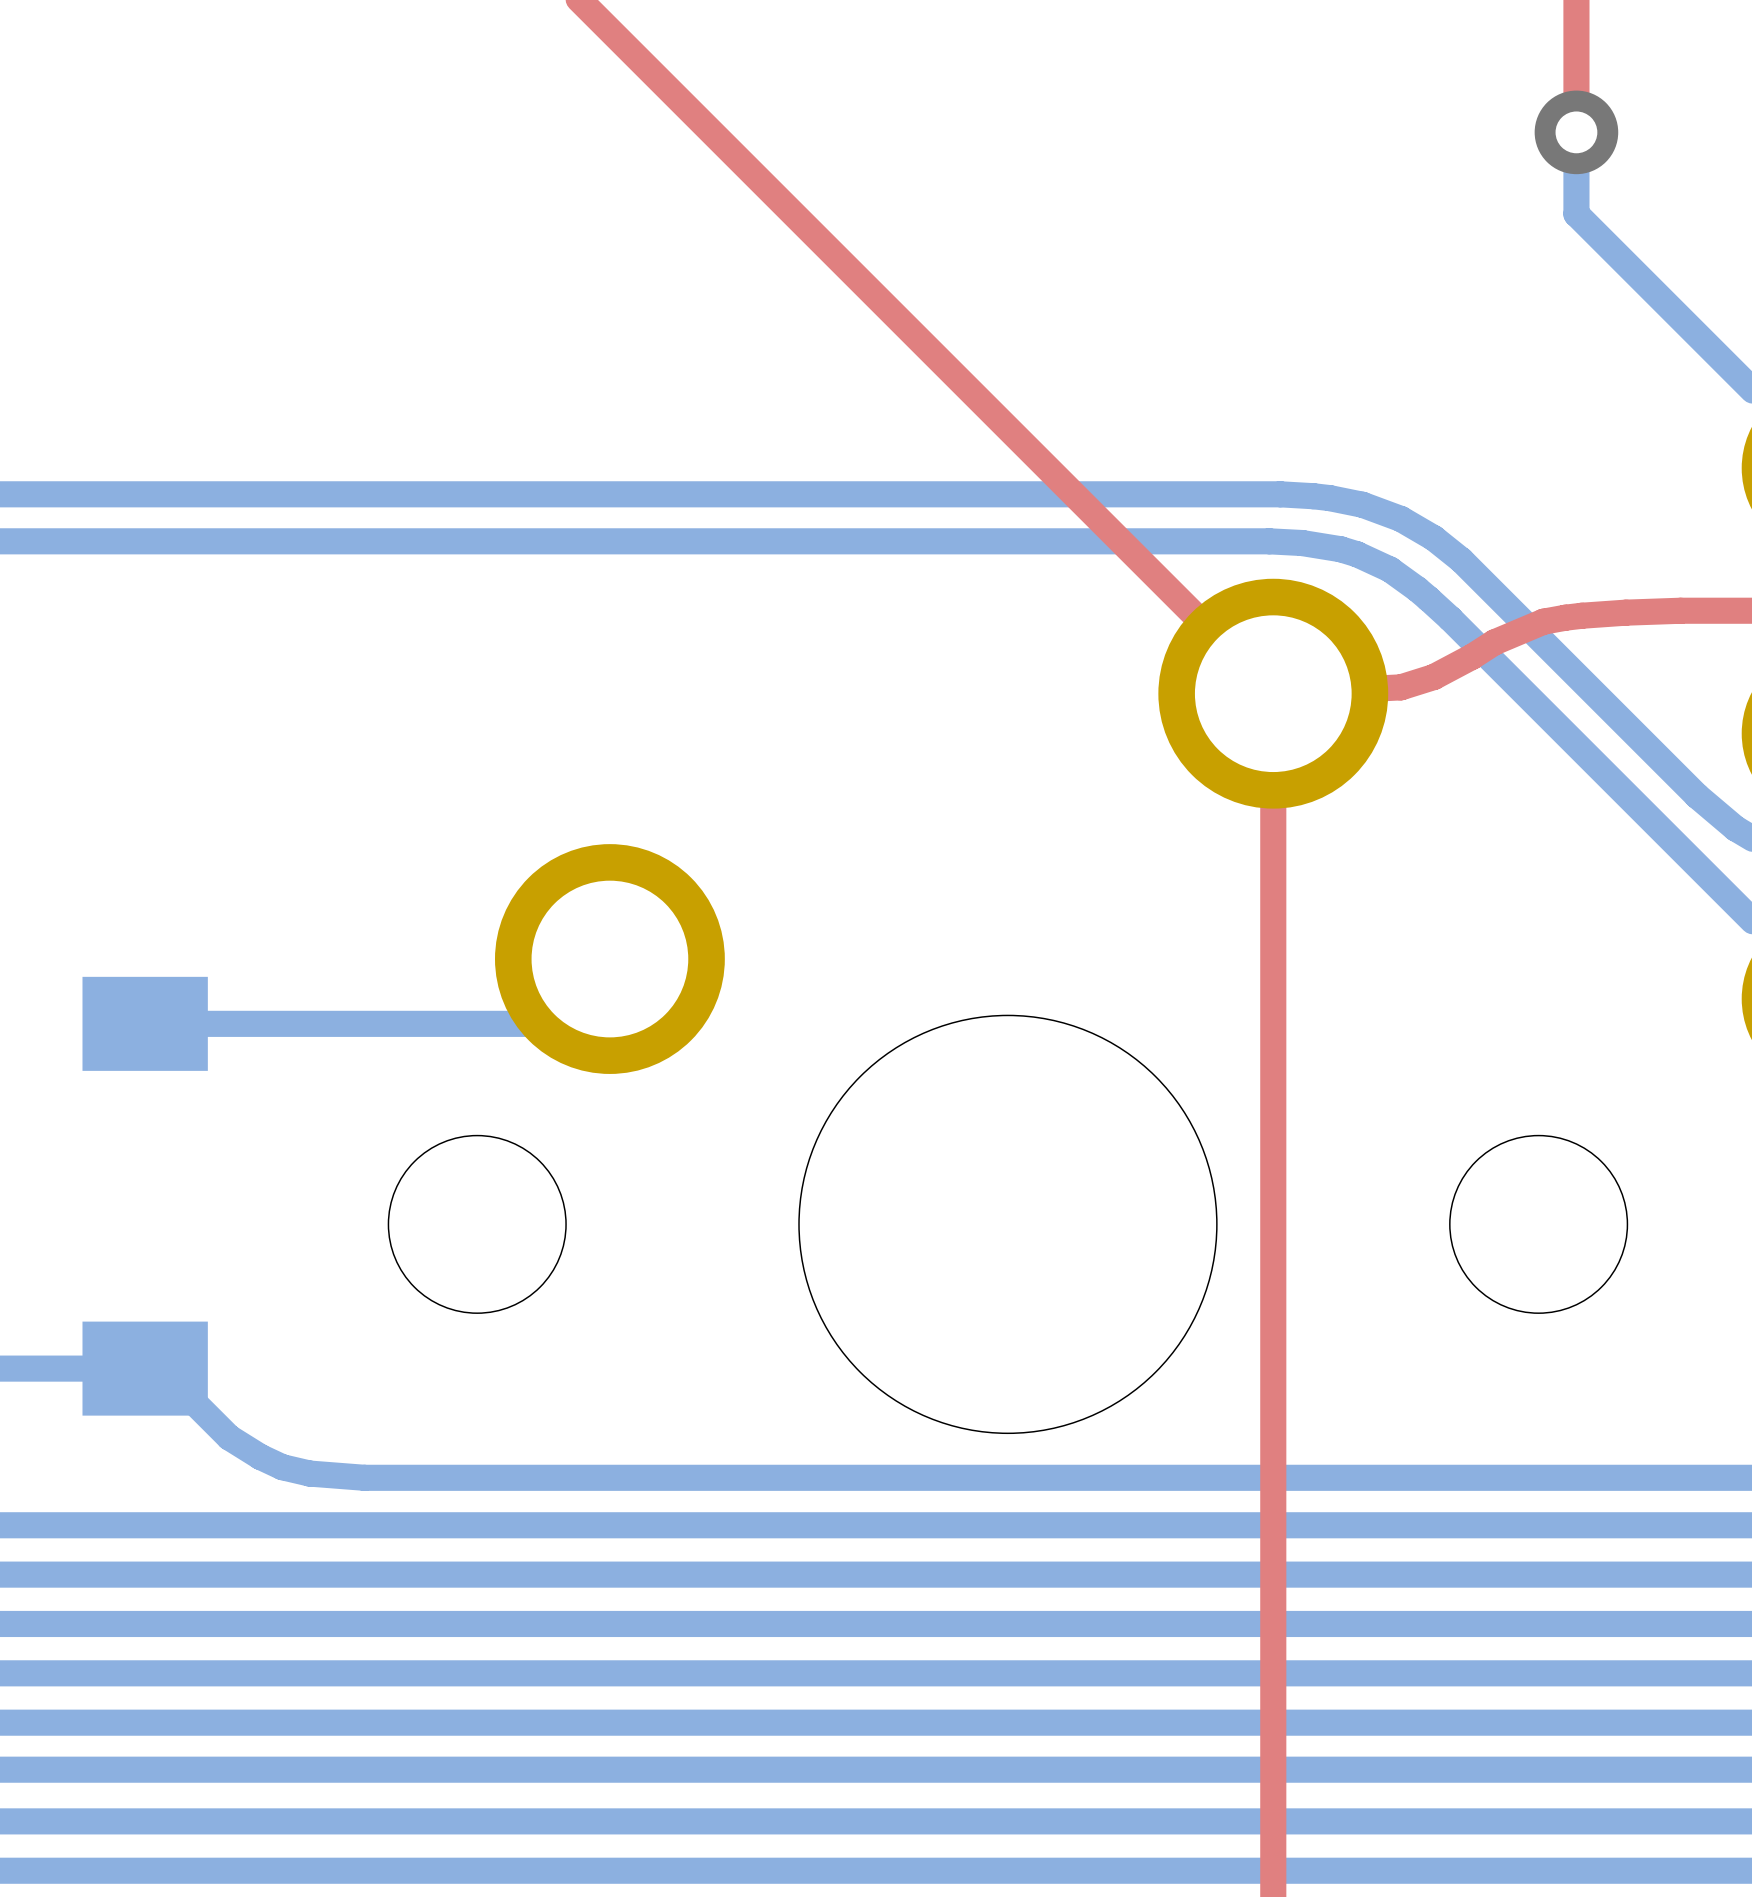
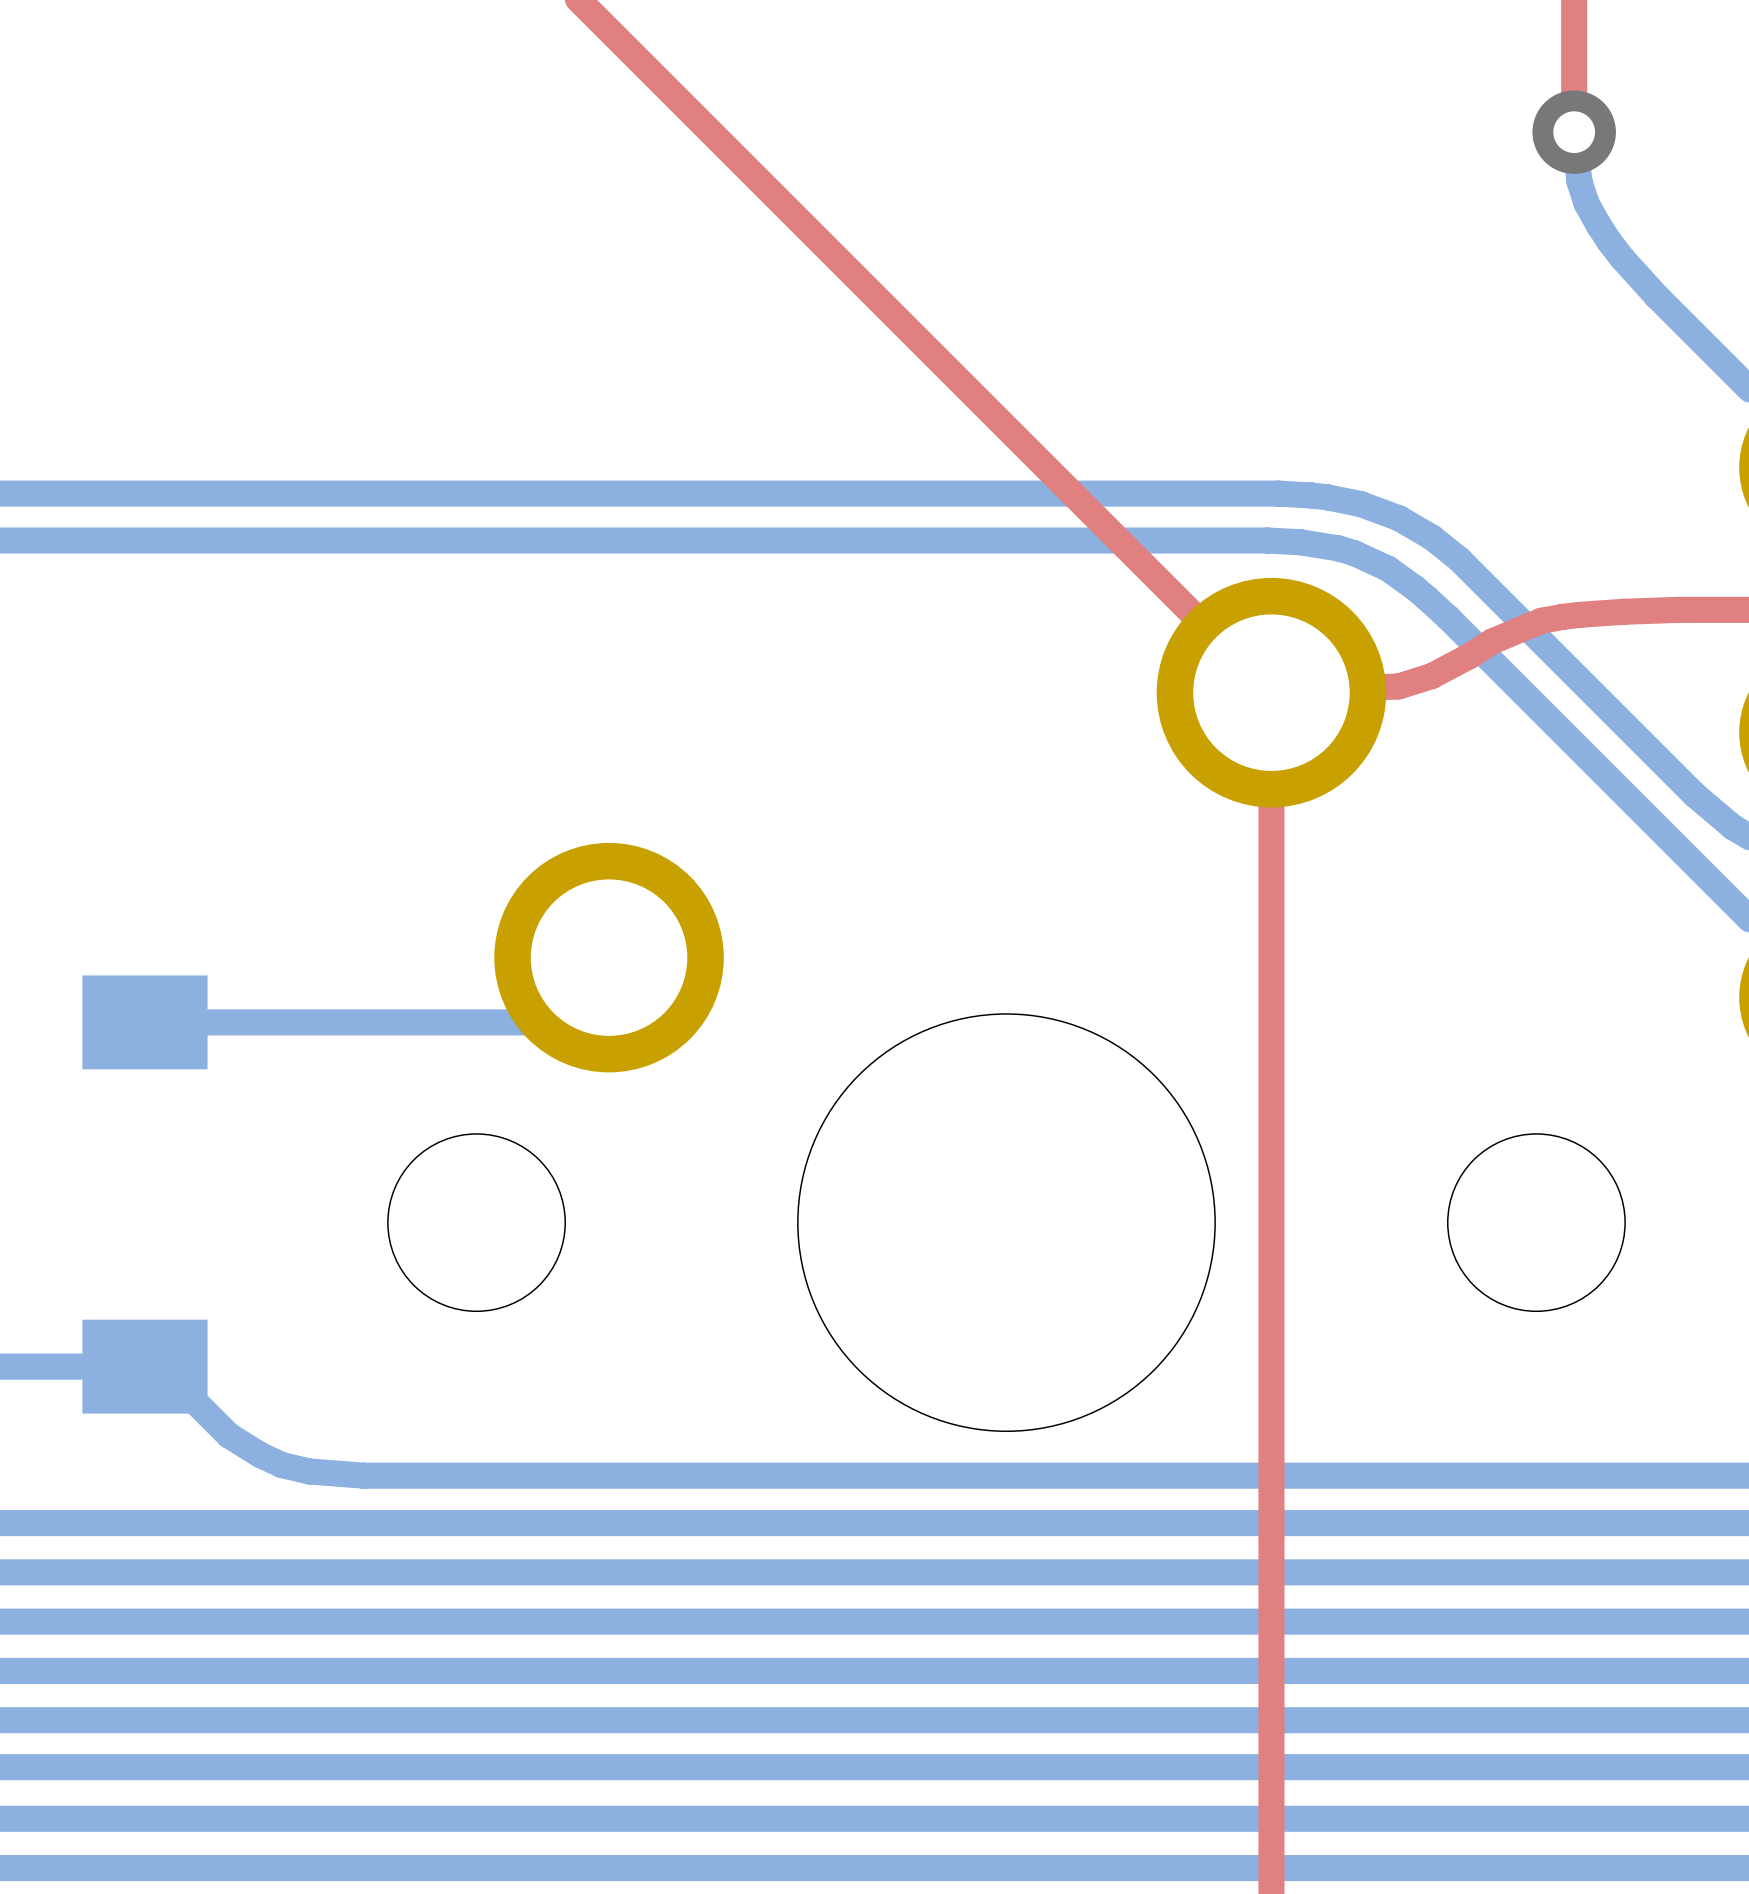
bottom track: (1576, 132) (1576, 214) (1658, 296) -> (1574, 132) (1579, 181) (1586, 203) (1609, 241) (1656, 295)

